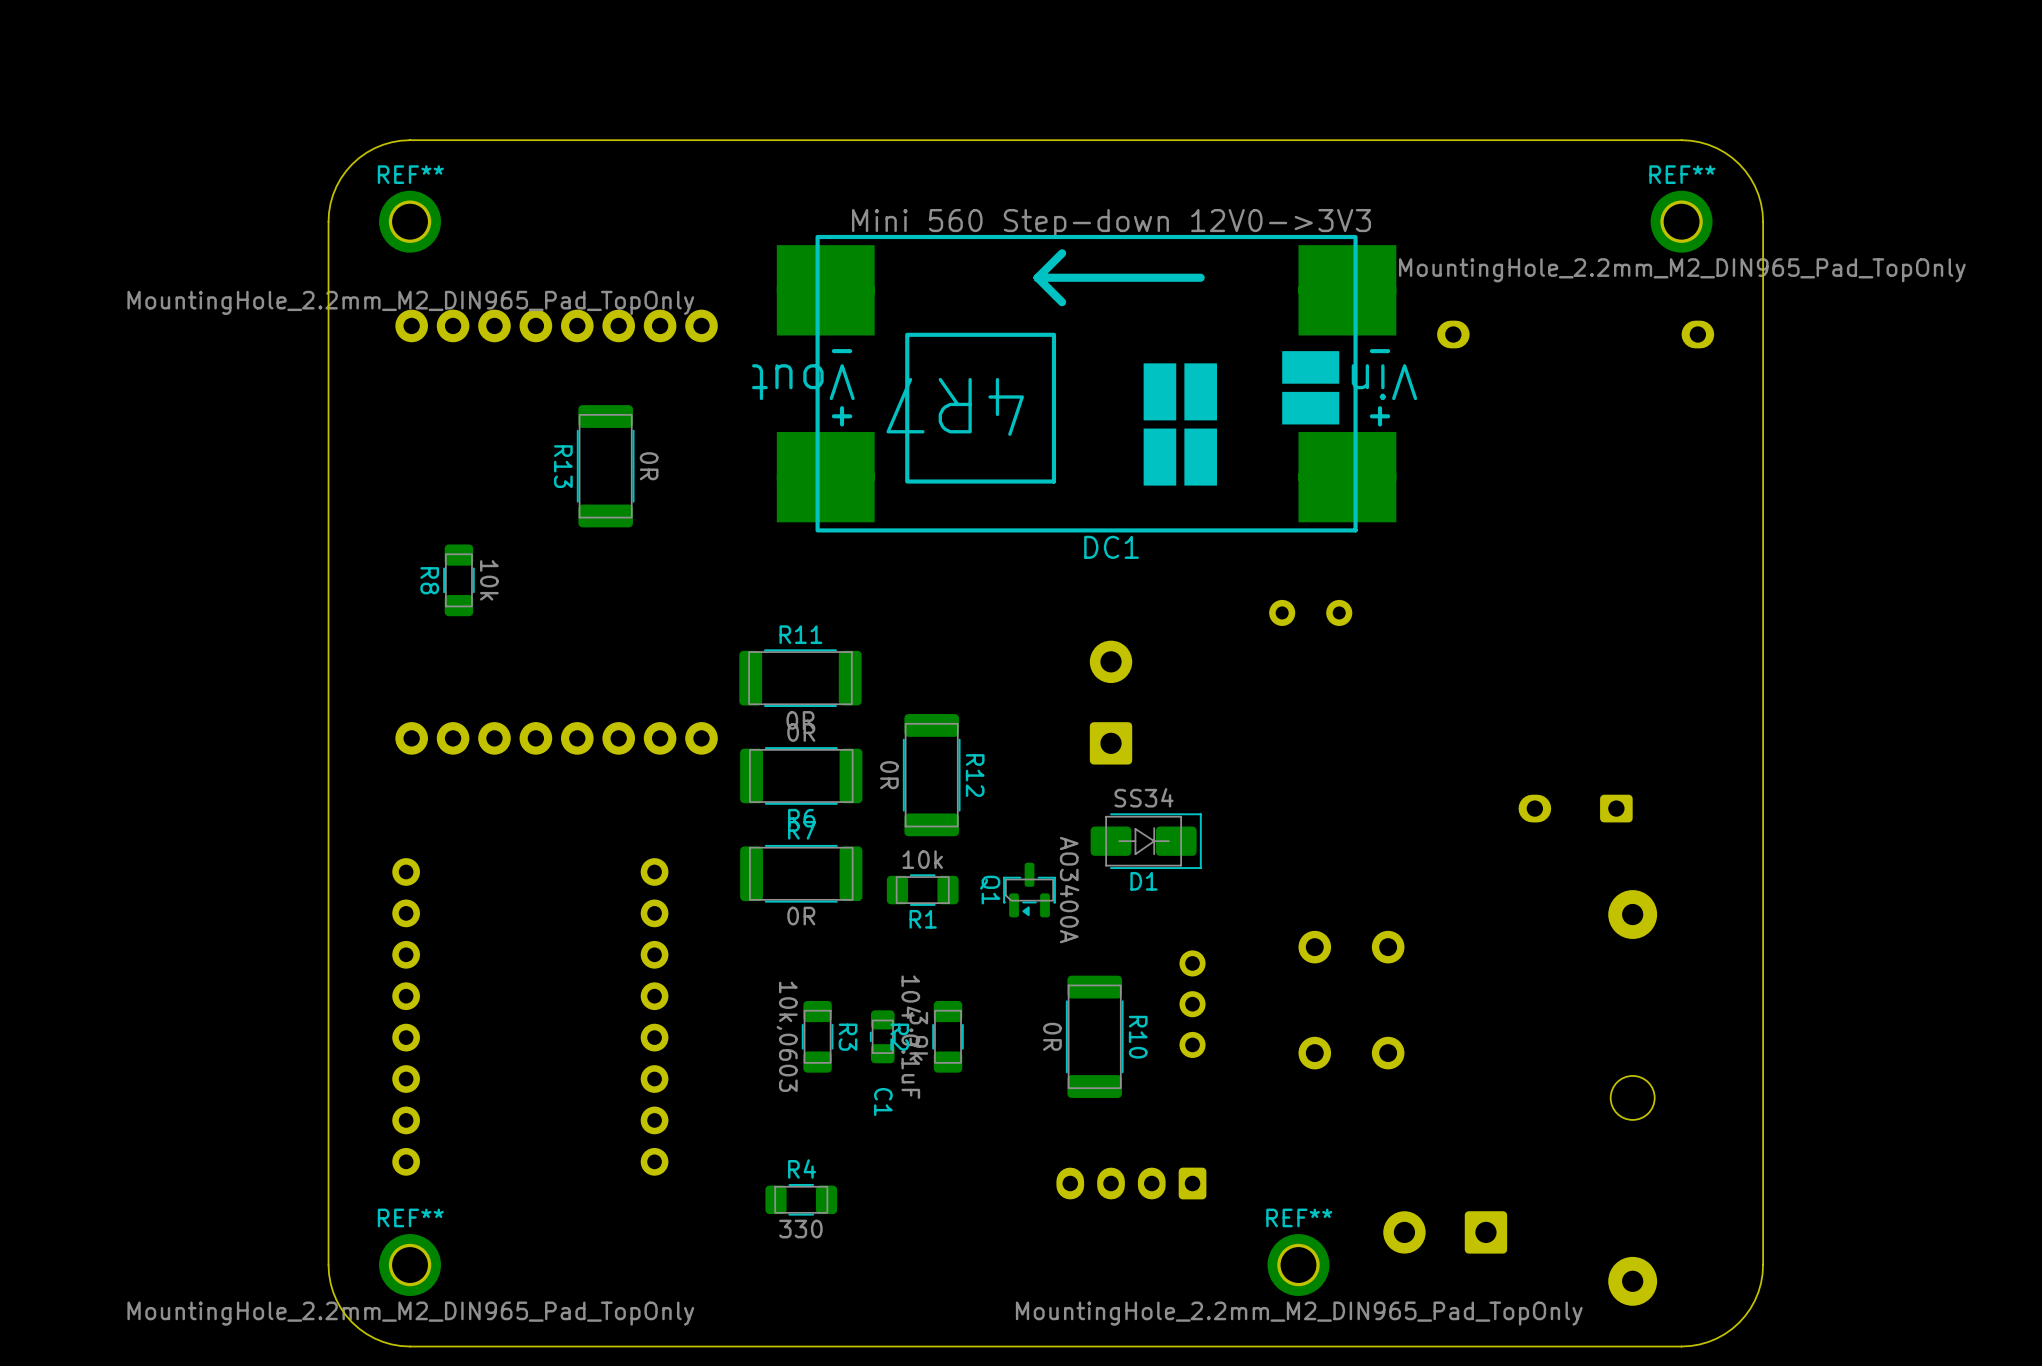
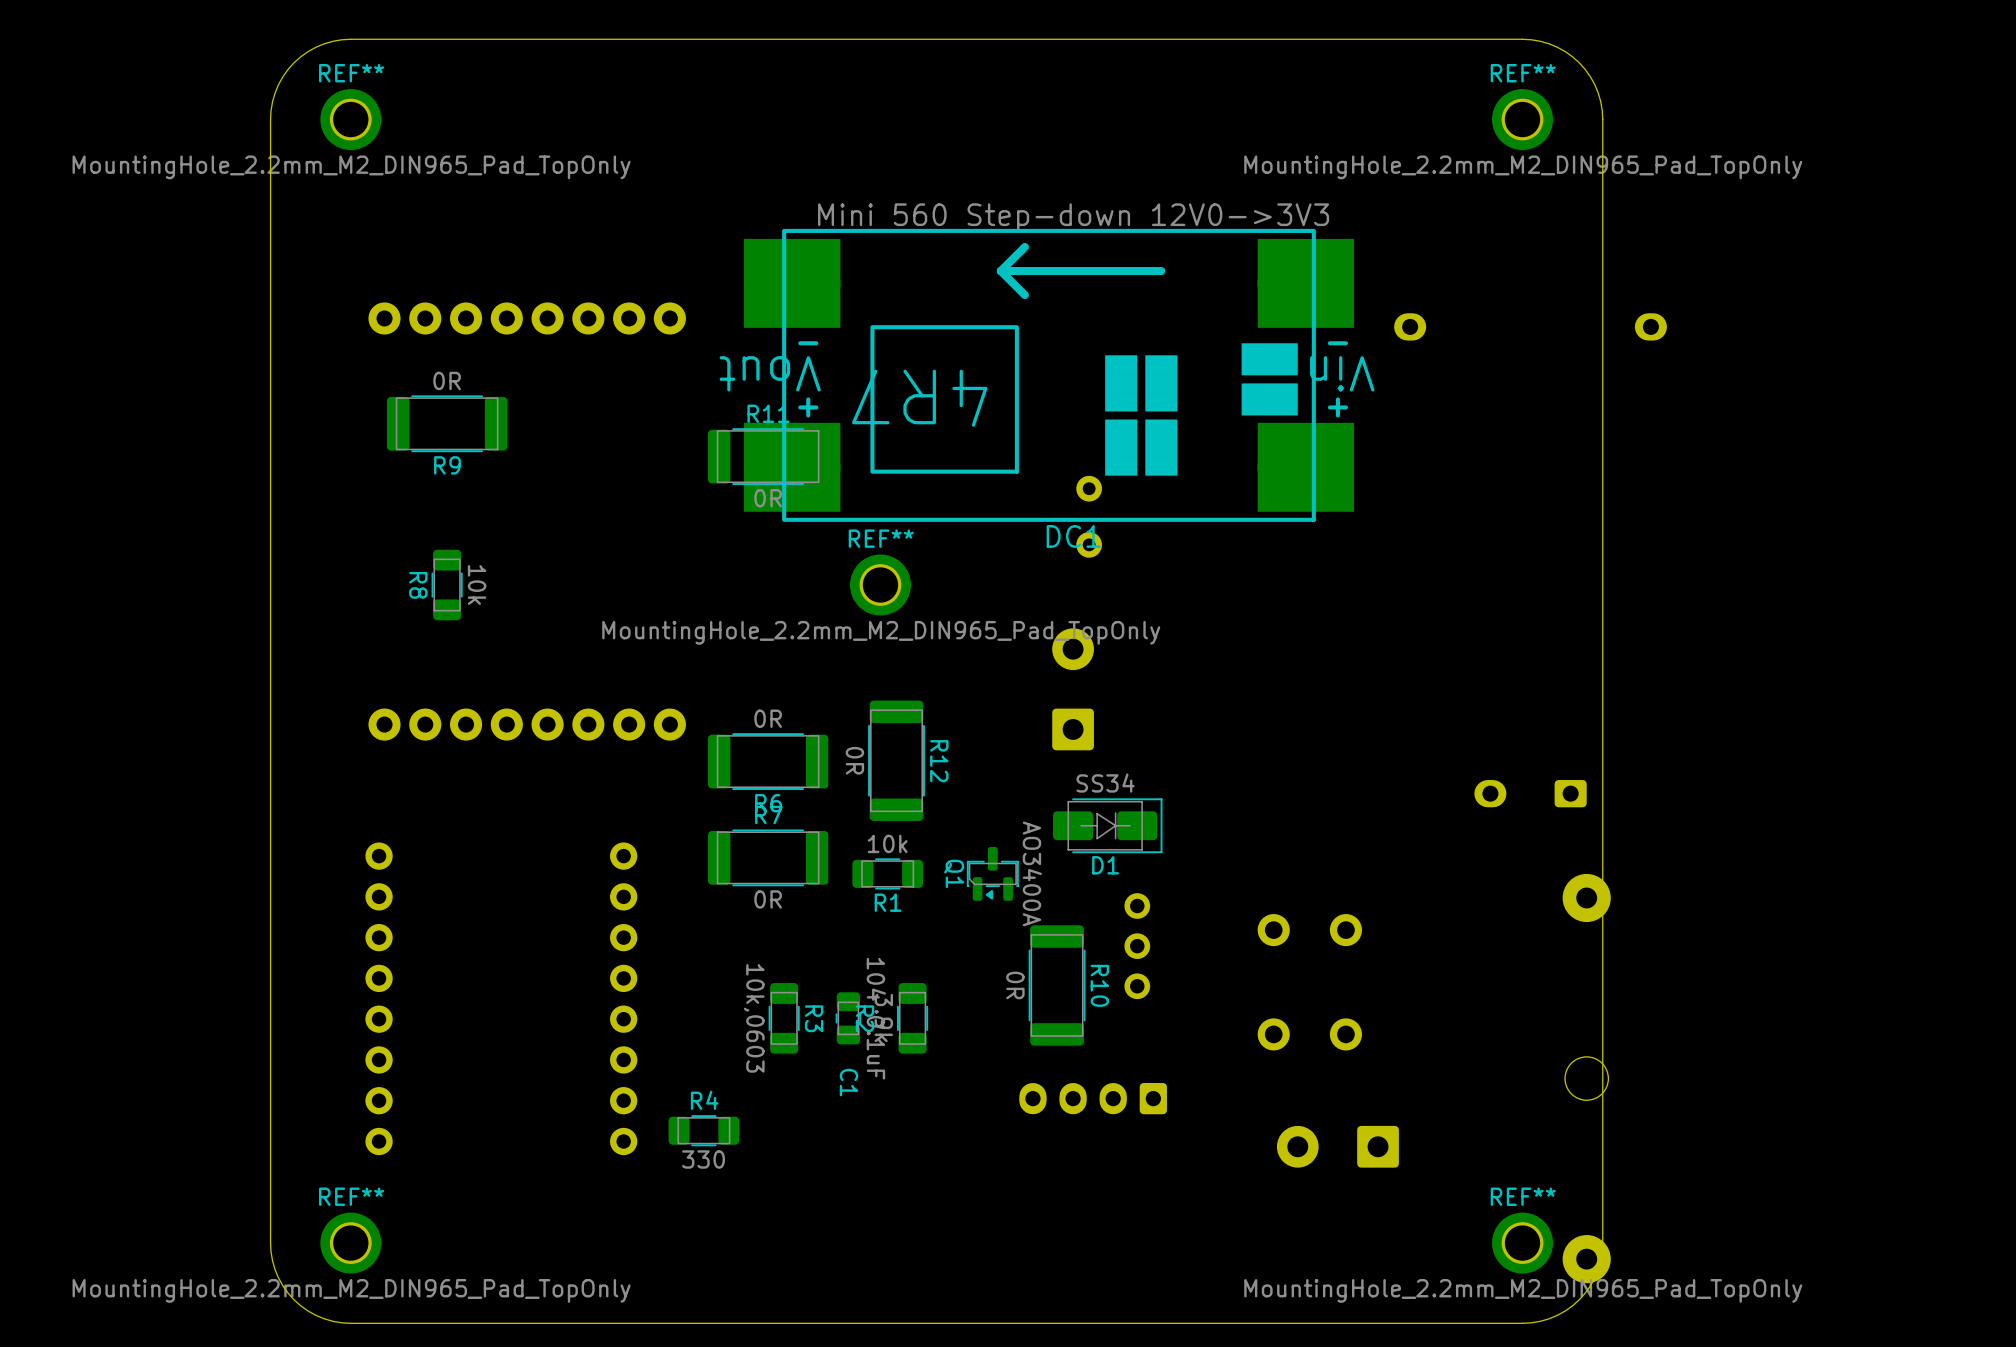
REF** position: (410, 221) -> (350, 119)
REF** position: (1681, 221) -> (1522, 119)
REF** value position: MountingHole_2.2mm_M2_DIN965_Pad_TopOnly (410, 302) -> MountingHole_2.2mm_M2_DIN965_Pad_TopOnly (351, 167)
R9: none -> 0R (447, 423)
R13: 0R (605, 466) -> none
R8 position: (458, 580) -> (447, 585)
REF**: none -> MountingHole_2.2mm_M2_DIN965_Pad_TopOnly (880, 585)
part rotation: 0° (1310, 612) -> 90° clockwise (1089, 516)
part position: (1310, 612) -> (1089, 516)
R11 position: (800, 678) -> (768, 456)
part position: (1192, 1004) -> (1137, 946)
R10 position: (1094, 1036) -> (1057, 985)
part position: (1131, 1183) -> (1093, 1098)
R4 position: (801, 1199) -> (703, 1130)
part position: (1445, 1232) -> (1337, 1146)
REF** position: (410, 1265) -> (350, 1243)
REF** position: (1298, 1265) -> (1522, 1243)
board edge: (1567, 1346) (1681, 1346) (1708, 1341) (1732, 1328) (1745, 1315) (1758, 1291) (1762, 1274) (1762, 212) (1755, 186) (1739, 164) (1716, 148) (1690, 140) (410, 140) (383, 144) (366, 152) (352, 164) (341, 178) (333, 194) (328, 221) (328, 1265) (333, 1291) (341, 1308) (352, 1322) (366, 1334) (383, 1341) (410, 1346) -> (1522, 1323) (1549, 1318) (1565, 1311) (1579, 1299) (1594, 1277) (1600, 1260) (1602, 1243) (1602, 119) (1598, 93) (1590, 76) (1579, 62) (1565, 51) (1549, 43) (1522, 39) (350, 39) (324, 43) (300, 56) (282, 76) (275, 93) (271, 110) (270, 1243) (272, 1260) (278, 1277) (288, 1293) (300, 1305) (315, 1315) (332, 1321) (382, 1323)

